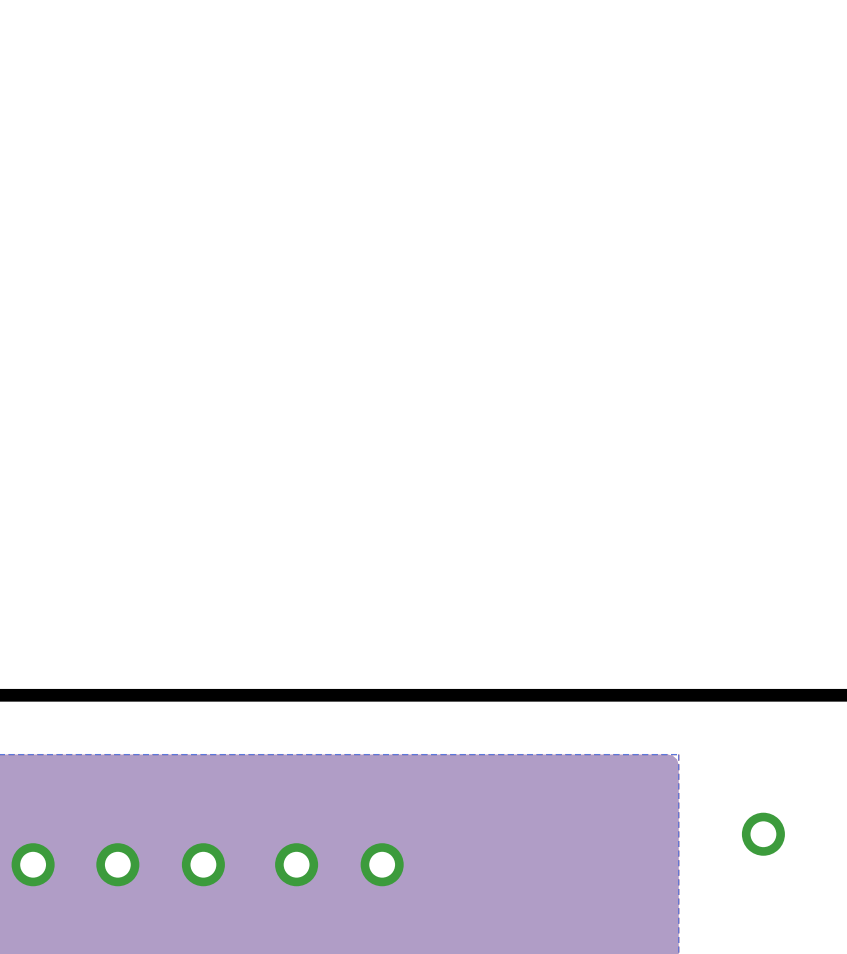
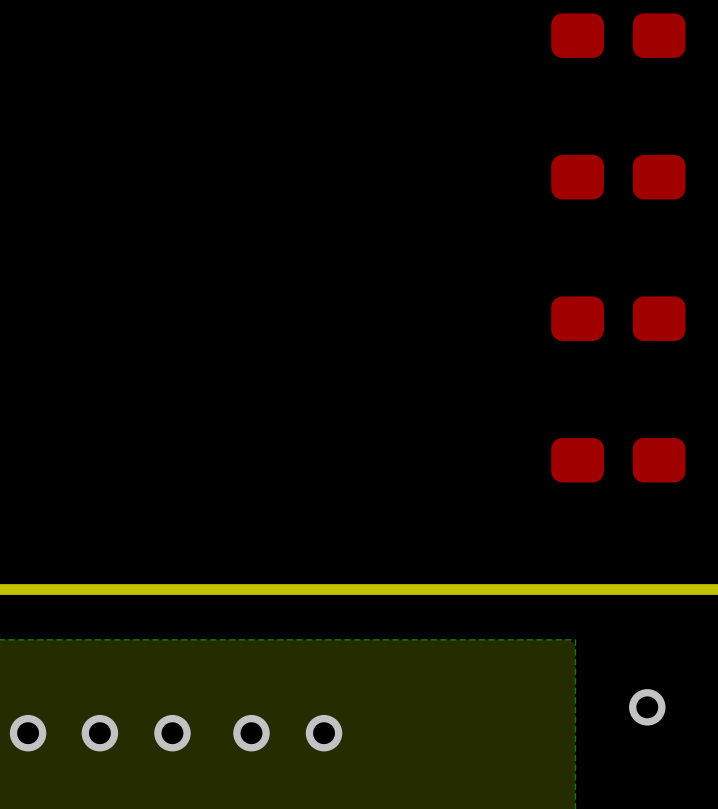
part: none -> (618, 35)
part: none -> (618, 177)
part: none -> (618, 318)
part: none -> (618, 460)

